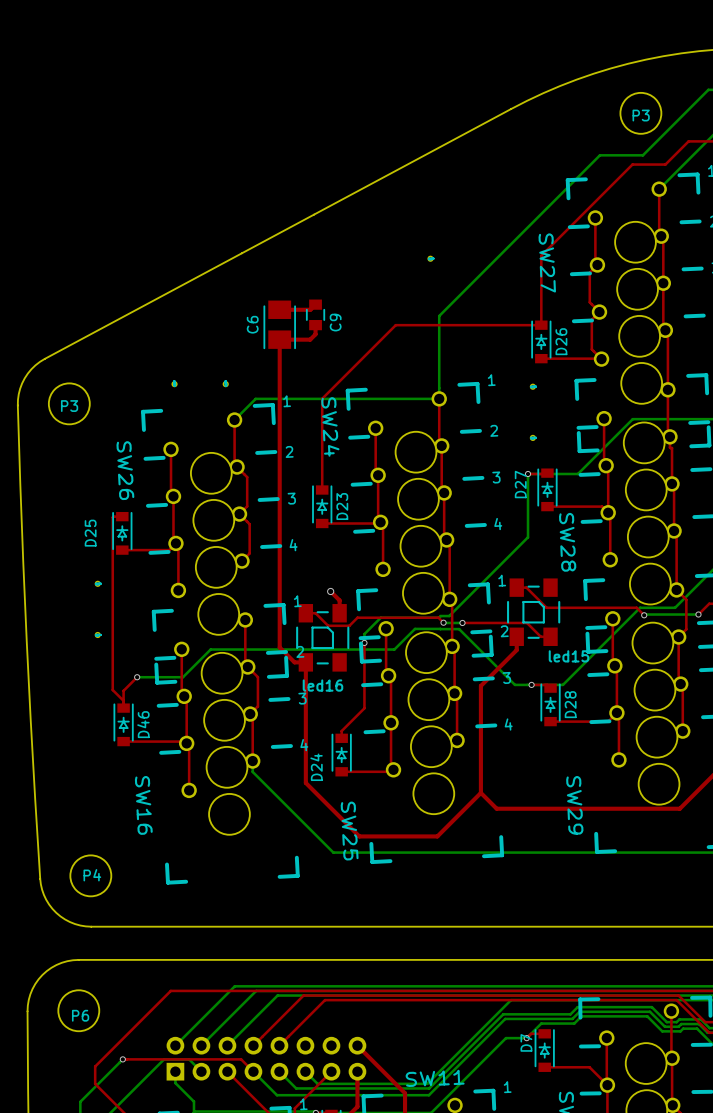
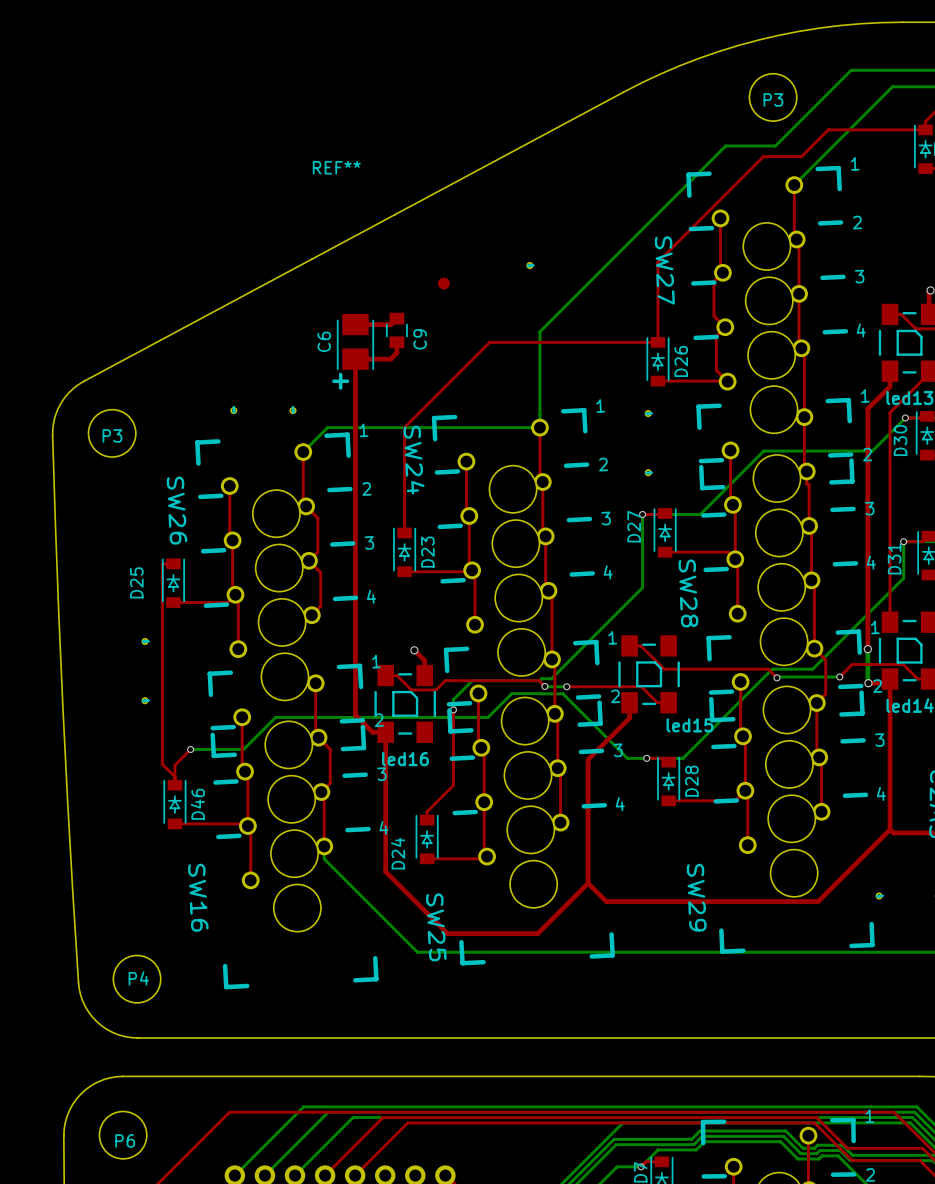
REF**: none -> (443, 283)
text: none -> + (340, 381)

